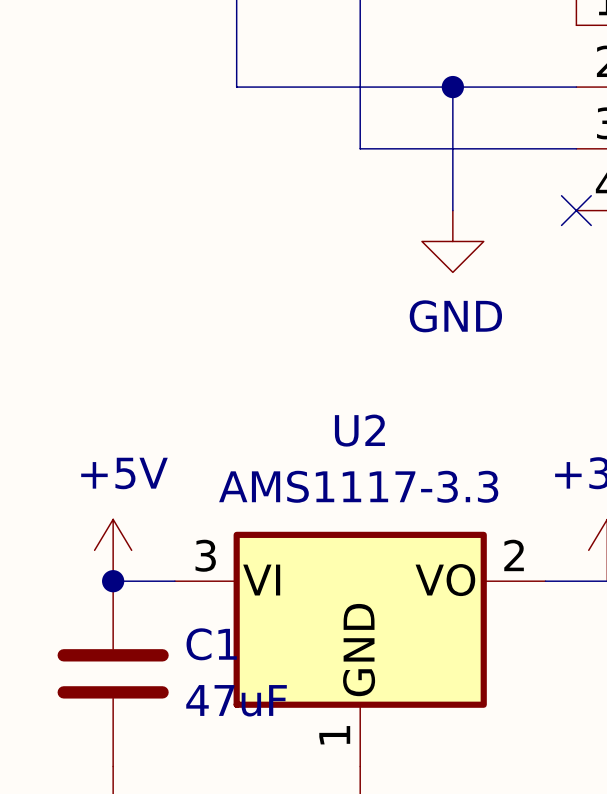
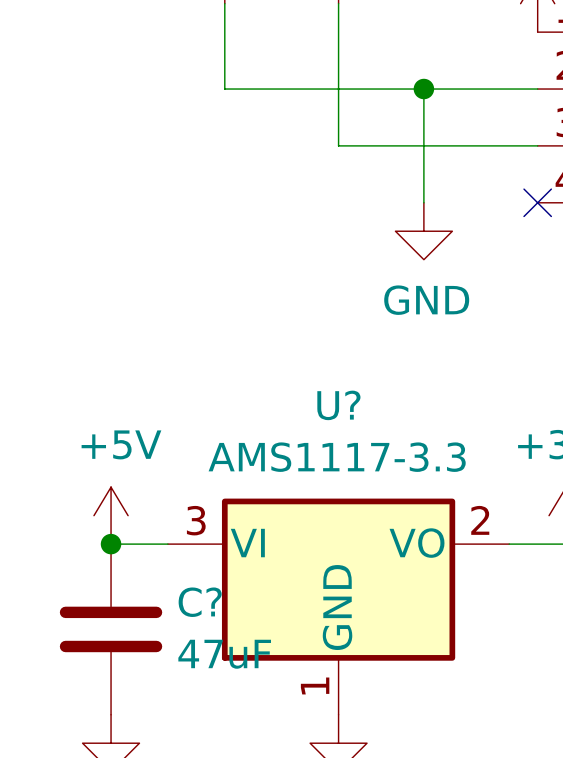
U2 name: U2 (359, 430) -> U? (338, 405)
C1 name: C1 (211, 644) -> C? (200, 602)

